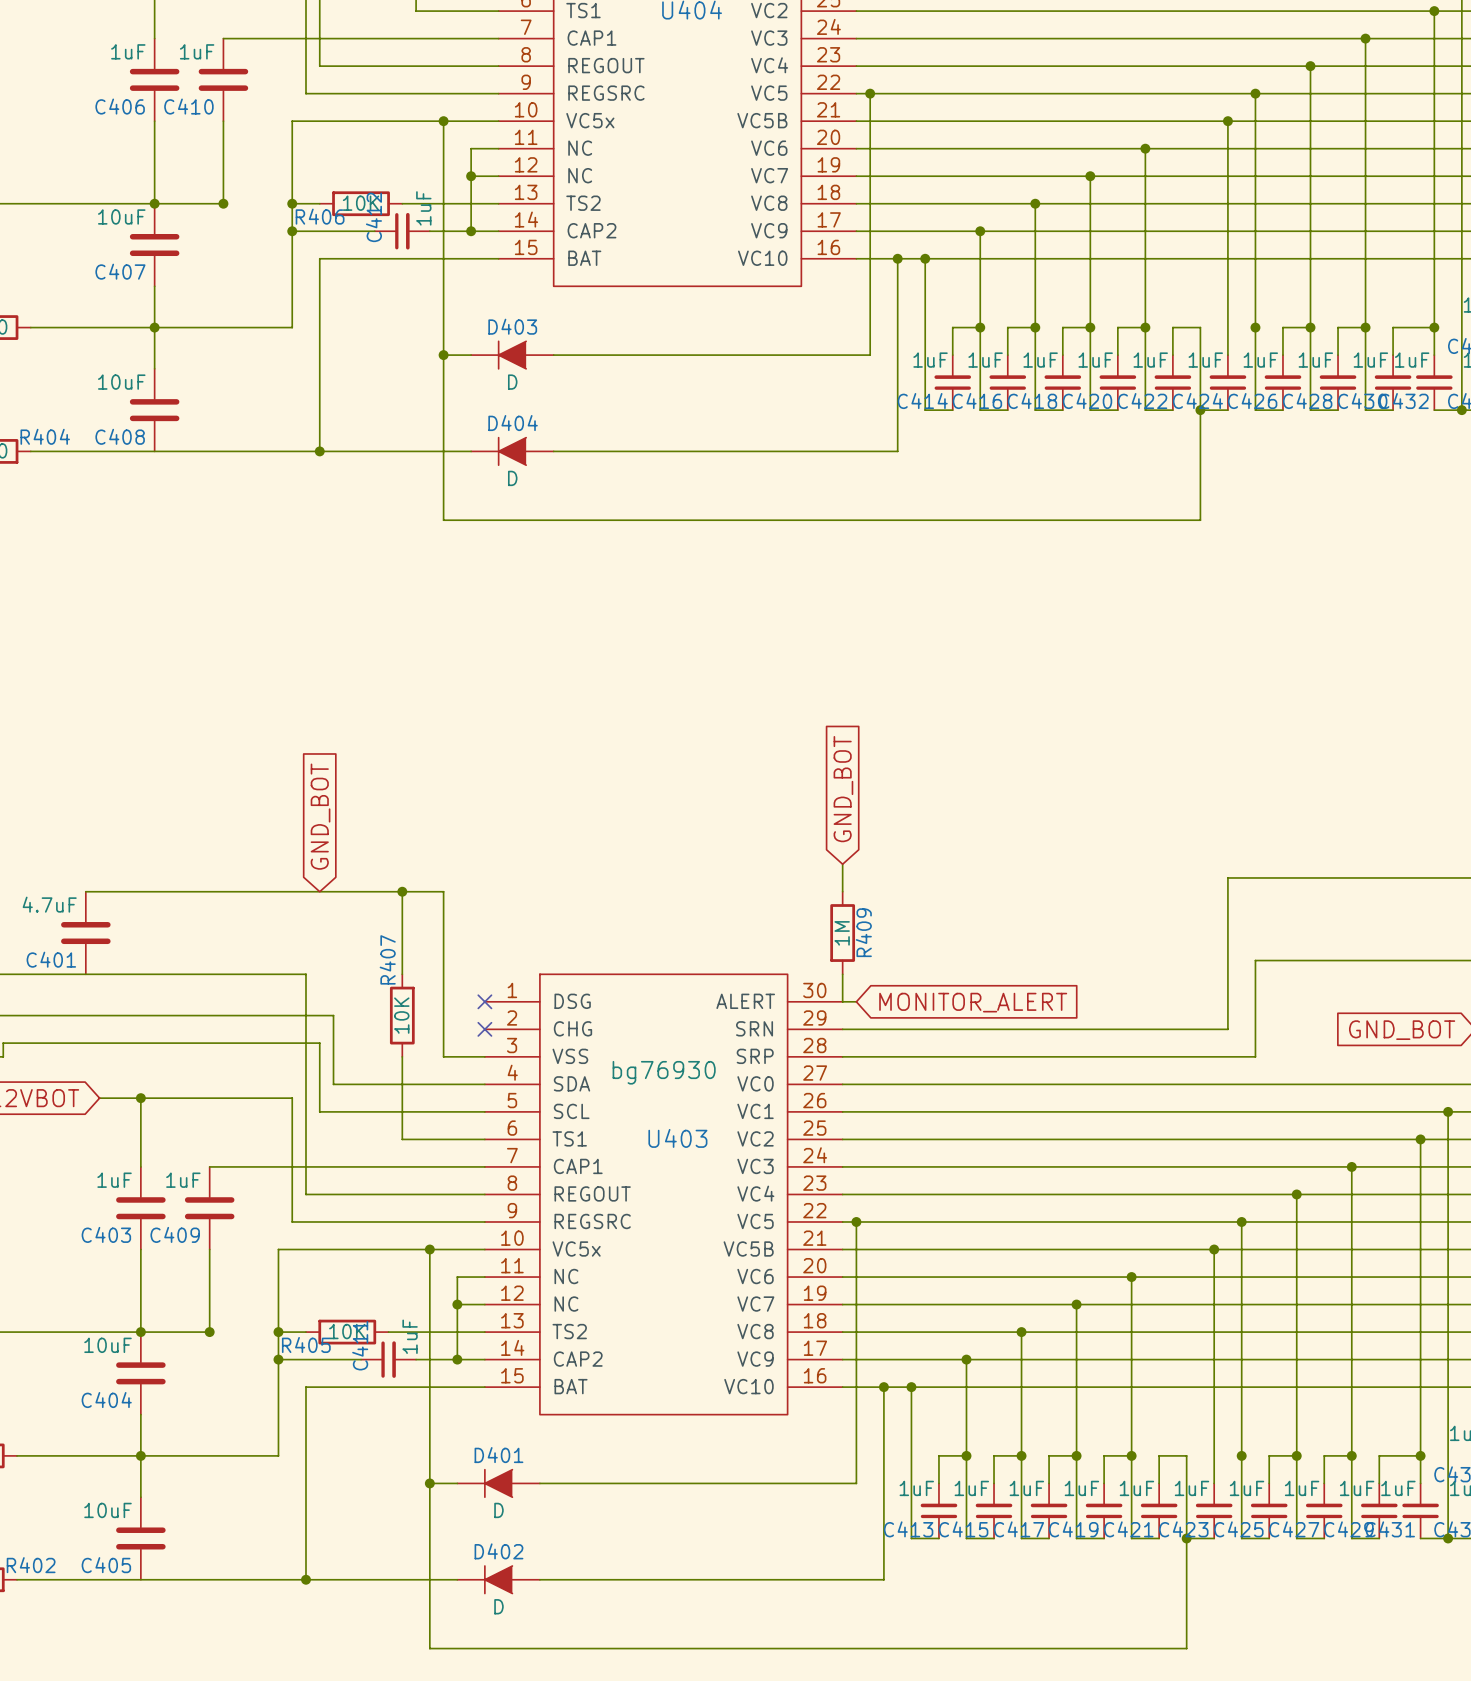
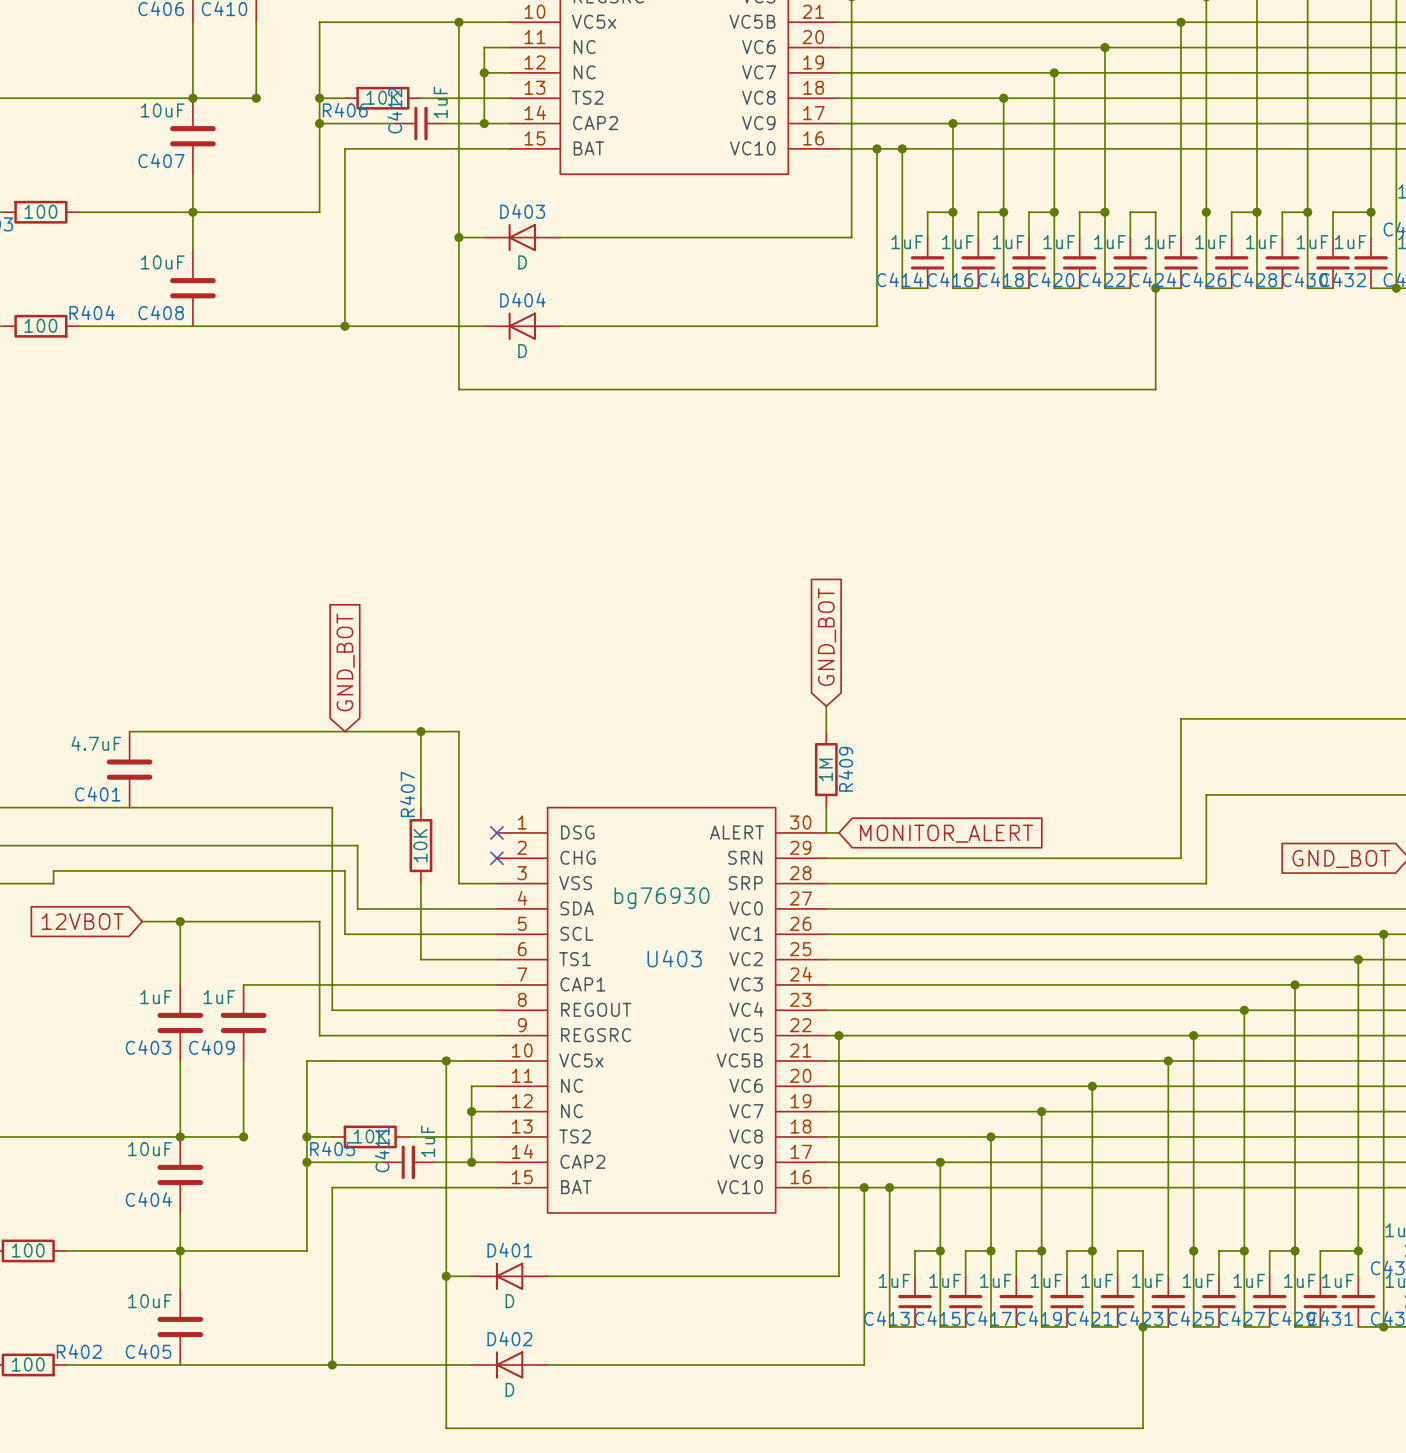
D403 symbol: [471, 340, 554, 370] -> [484, 223, 561, 252]
D404 symbol: [471, 436, 554, 467] -> [484, 312, 561, 340]
D401 symbol: [457, 1468, 540, 1499] -> [471, 1262, 548, 1290]
D402 symbol: [457, 1565, 540, 1595] -> [471, 1351, 548, 1379]

